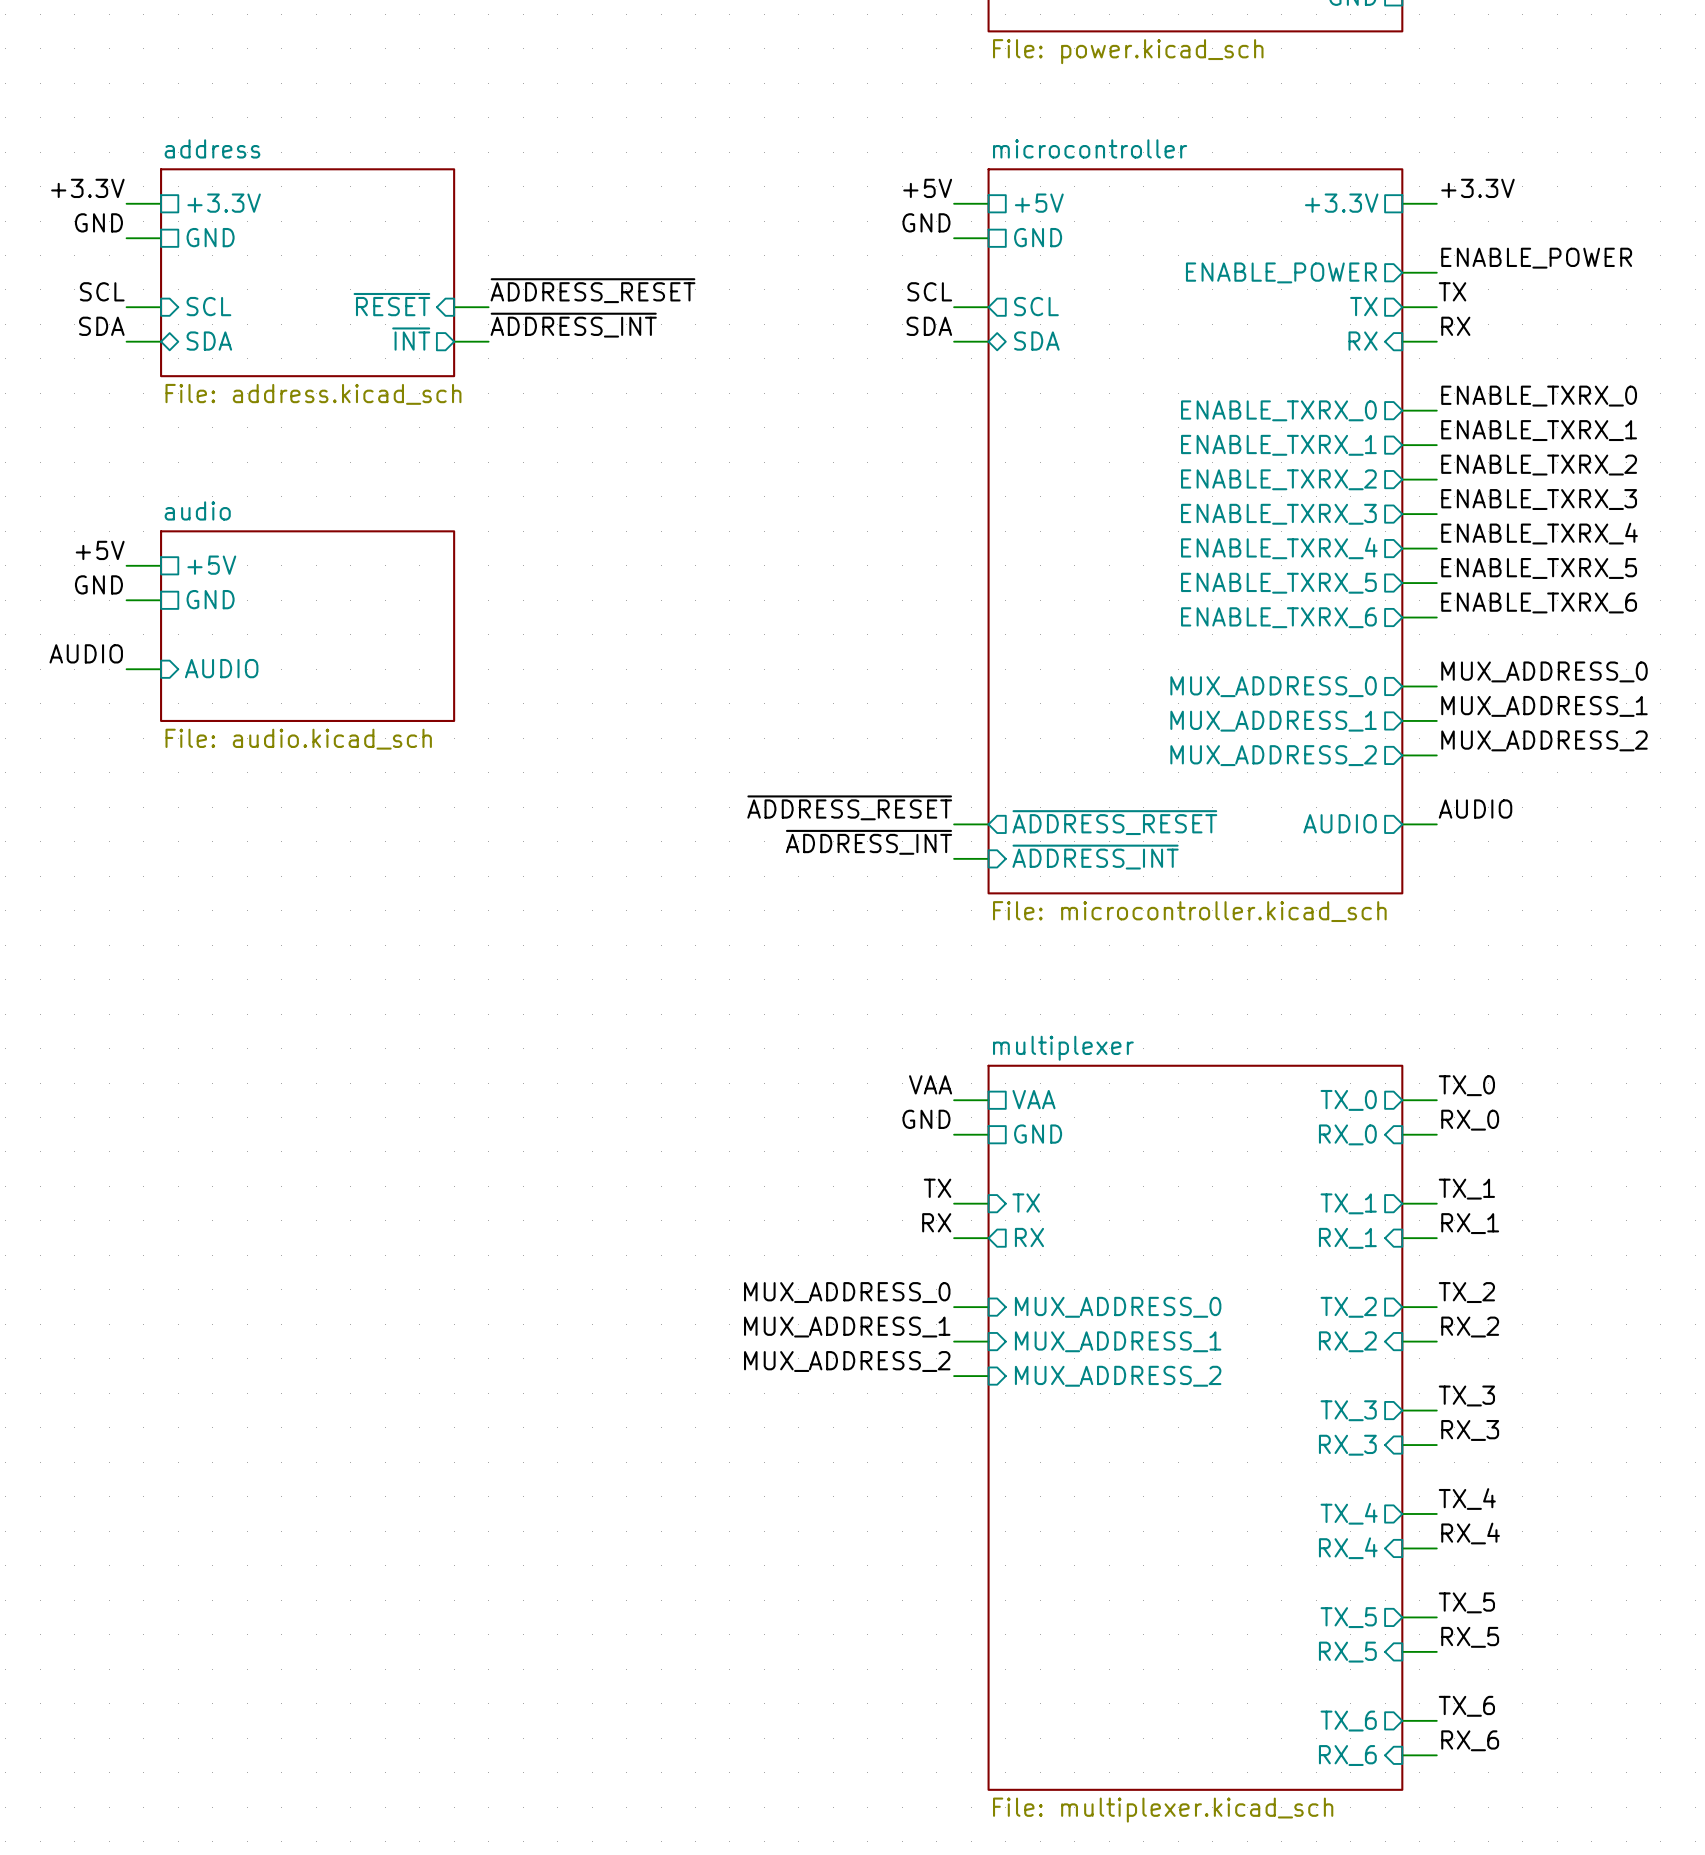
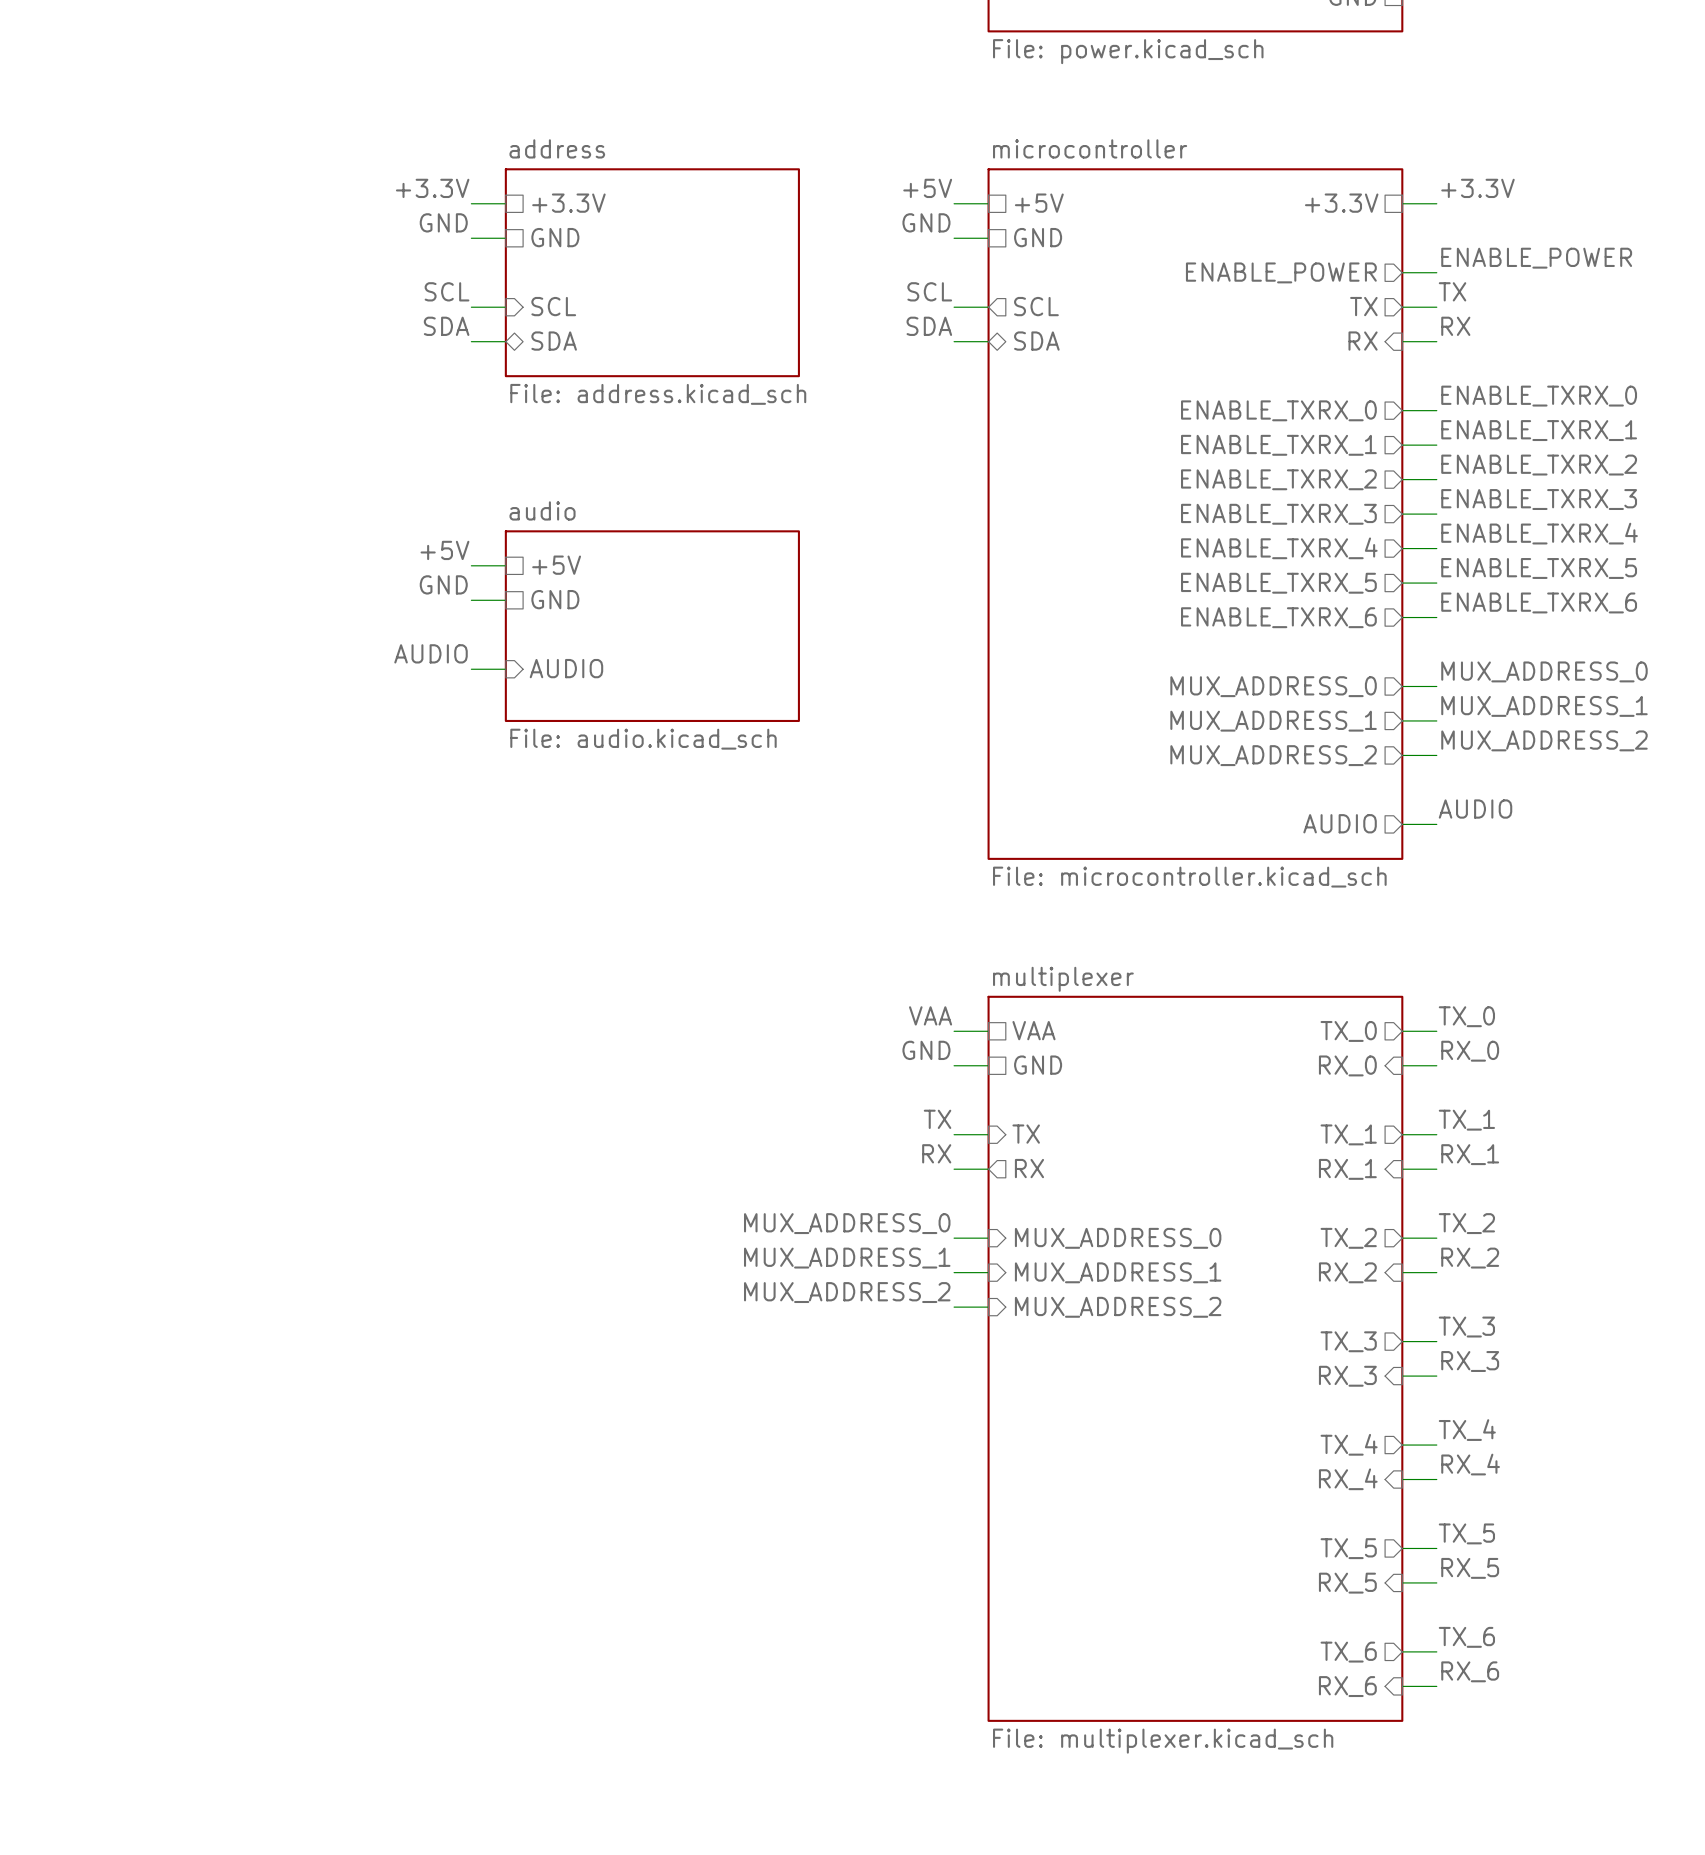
label: +3.3V (87, 188) -> none
label: none -> +3.3V (432, 188)
wire: (126, 203) (161, 203) -> none
sheet pin: +3.3V (224, 203) -> none
wire: none -> (471, 203) (505, 203)
sheet pin: none -> +3.3V (568, 203)
label: GND (98, 222) -> none
label: none -> GND (443, 222)
sheet pin: GND (210, 237) -> none
sheet pin: none -> GND (555, 237)
wire: (126, 238) (161, 238) -> none
wire: none -> (471, 238) (505, 238)
sheet address: File: address.kicad_sch (307, 272) -> none
sheet address: none -> File: address.kicad_sch (652, 272)
label: ~{ADDRESS_RESET} (593, 290) -> none
label: SCL (102, 291) -> none
label: none -> SCL (447, 291)
sheet pin: ~{RESET} (391, 304) -> none
sheet pin: SCL (208, 306) -> none
sheet pin: none -> SCL (553, 306)
wire: (126, 307) (161, 307) -> none
wire: (454, 307) (471, 307) -> (488, 307) (505, 307)
label: ~{ADDRESS_INT} (573, 325) -> none
label: SDA (101, 326) -> none
label: none -> SDA (446, 326)
sheet pin: ~{INT} (411, 339) -> none
wire: (126, 341) (161, 341) -> none
sheet pin: SDA (209, 341) -> none
wire: (454, 341) (471, 341) -> (488, 341) (505, 341)
sheet pin: none -> SDA (554, 341)
sheet microcontroller: none -> File: microcontroller.kicad_sch (1195, 514)
sheet microcontroller: File: microcontroller.kicad_sch (1195, 531) -> none
label: +5V (100, 550) -> none
label: none -> +5V (444, 550)
wire: (126, 565) (161, 565) -> none
sheet pin: +5V (211, 565) -> none
wire: none -> (471, 565) (505, 565)
sheet pin: none -> +5V (556, 565)
label: GND (98, 584) -> none
label: none -> GND (443, 584)
sheet pin: GND (210, 599) -> none
sheet pin: none -> GND (555, 599)
wire: (126, 600) (161, 600) -> none
wire: none -> (471, 600) (505, 600)
sheet audio: File: audio.kicad_sch (307, 626) -> none
sheet audio: none -> File: audio.kicad_sch (652, 626)
label: AUDIO (86, 653) -> none
label: none -> AUDIO (431, 653)
sheet pin: AUDIO (221, 668) -> none
sheet pin: none -> AUDIO (566, 668)
wire: (126, 669) (161, 669) -> none
wire: none -> (471, 669) (505, 669)
label: ~{ADDRESS_RESET} (849, 807) -> none
sheet pin: ~{ADDRESS_RESET} (1114, 822) -> none
wire: (954, 824) (988, 824) -> none
label: ~{ADDRESS_INT} (868, 842) -> none
sheet pin: ~{ADDRESS_INT} (1095, 857) -> none
wire: (954, 858) (988, 858) -> (954, 1031) (988, 1031)
wire: none -> (1402, 1031) (1436, 1031)
label: none -> GND (926, 1050)
label: none -> RX_0 (1470, 1051)
sheet pin: none -> GND (1038, 1065)
sheet pin: none -> RX_0 (1347, 1065)
label position: VAA (930, 1084) -> VAA (930, 1015)
label position: TX_0 (1466, 1085) -> TX_0 (1466, 1016)
sheet pin position: VAA (1033, 1099) -> VAA (1033, 1030)
wire: (954, 1100) (988, 1100) -> (954, 1065) (988, 1065)
sheet pin position: TX_0 (1348, 1100) -> TX_0 (1348, 1031)
wire: (1402, 1100) (1436, 1100) -> (1402, 1065) (1436, 1065)
label: GND (926, 1119) -> TX (937, 1119)
label: RX_0 (1470, 1120) -> TX_1 (1466, 1120)
sheet pin shape: passive (1038, 1134) -> input (1026, 1134)
sheet pin: GND (1038, 1134) -> TX (1026, 1134)
sheet pin shape: input (1347, 1134) -> output (1348, 1134)
sheet pin: RX_0 (1347, 1134) -> TX_1 (1348, 1134)
label: none -> RX (936, 1153)
sheet pin: none -> RX (1029, 1168)
label: TX (937, 1188) -> none
label: TX_1 (1466, 1189) -> RX_1 (1470, 1154)
wire: (954, 1203) (988, 1203) -> (954, 1169) (988, 1169)
sheet pin: TX (1026, 1203) -> none
sheet pin shape: output (1348, 1203) -> input (1347, 1169)
sheet pin: TX_1 (1348, 1203) -> RX_1 (1347, 1169)
wire: (1402, 1203) (1436, 1203) -> (1402, 1169) (1436, 1169)
label: RX (936, 1222) -> MUX_ADDRESS_0 (847, 1223)
label: RX_1 (1470, 1223) -> TX_2 (1466, 1223)
sheet pin shape: output (1029, 1237) -> input (1118, 1238)
sheet pin: RX (1029, 1237) -> MUX_ADDRESS_0 (1118, 1238)
sheet pin shape: input (1347, 1238) -> output (1348, 1238)
sheet pin: RX_1 (1347, 1238) -> TX_2 (1348, 1238)
label: MUX_ADDRESS_0 (847, 1292) -> MUX_ADDRESS_2 (847, 1292)
label: TX_2 (1466, 1292) -> RX_2 (1470, 1258)
sheet pin: MUX_ADDRESS_0 (1118, 1307) -> MUX_ADDRESS_2 (1118, 1307)
sheet pin shape: output (1348, 1307) -> input (1347, 1272)
sheet pin: TX_2 (1348, 1307) -> RX_2 (1347, 1272)
wire: (1402, 1307) (1436, 1307) -> (1402, 1272) (1436, 1272)
label position: MUX_ADDRESS_1 (847, 1327) -> MUX_ADDRESS_1 (847, 1258)
label: RX_2 (1470, 1327) -> TX_3 (1466, 1327)
wire: (954, 1341) (988, 1341) -> (954, 1272) (988, 1272)
sheet pin position: MUX_ADDRESS_1 (1118, 1341) -> MUX_ADDRESS_1 (1118, 1272)
sheet pin shape: input (1347, 1341) -> output (1348, 1341)
sheet pin: RX_2 (1347, 1341) -> TX_3 (1348, 1341)
label: MUX_ADDRESS_2 (847, 1361) -> none
wire: (954, 1376) (988, 1376) -> none
sheet pin: MUX_ADDRESS_2 (1118, 1376) -> none
label: TX_3 (1466, 1395) -> RX_3 (1470, 1361)
sheet pin shape: output (1348, 1410) -> input (1347, 1376)
sheet pin: TX_3 (1348, 1410) -> RX_3 (1347, 1376)
wire: (1402, 1410) (1436, 1410) -> (1402, 1376) (1436, 1376)
sheet multiplexer position: (1195, 1427) -> (1195, 1358)
label: RX_3 (1470, 1430) -> TX_4 (1467, 1430)
sheet pin shape: input (1347, 1445) -> output (1349, 1444)
sheet pin: RX_3 (1347, 1445) -> TX_4 (1349, 1444)
label: TX_4 (1467, 1499) -> RX_4 (1470, 1464)
sheet pin shape: output (1349, 1513) -> input (1348, 1479)
sheet pin: TX_4 (1349, 1513) -> RX_4 (1348, 1479)
wire: (1402, 1513) (1436, 1513) -> (1402, 1479) (1436, 1479)
label: RX_4 (1470, 1533) -> TX_5 (1466, 1533)
sheet pin shape: input (1348, 1548) -> output (1348, 1548)
sheet pin: RX_4 (1348, 1548) -> TX_5 (1348, 1548)
label: TX_5 (1466, 1602) -> RX_5 (1470, 1568)
sheet pin shape: output (1348, 1617) -> input (1347, 1583)
sheet pin: TX_5 (1348, 1617) -> RX_5 (1347, 1583)
wire: (1402, 1617) (1436, 1617) -> (1402, 1582) (1436, 1582)
label: RX_5 (1470, 1637) -> TX_6 (1466, 1637)
sheet pin shape: input (1347, 1652) -> output (1348, 1652)
sheet pin: RX_5 (1347, 1652) -> TX_6 (1348, 1652)
label: TX_6 (1466, 1706) -> none
wire: (1402, 1720) (1436, 1720) -> (1402, 1686) (1436, 1686)
sheet pin: TX_6 (1348, 1721) -> none
label position: RX_6 (1470, 1740) -> RX_6 (1470, 1671)
sheet pin position: RX_6 (1347, 1755) -> RX_6 (1347, 1686)
wire: (1402, 1755) (1436, 1755) -> none

